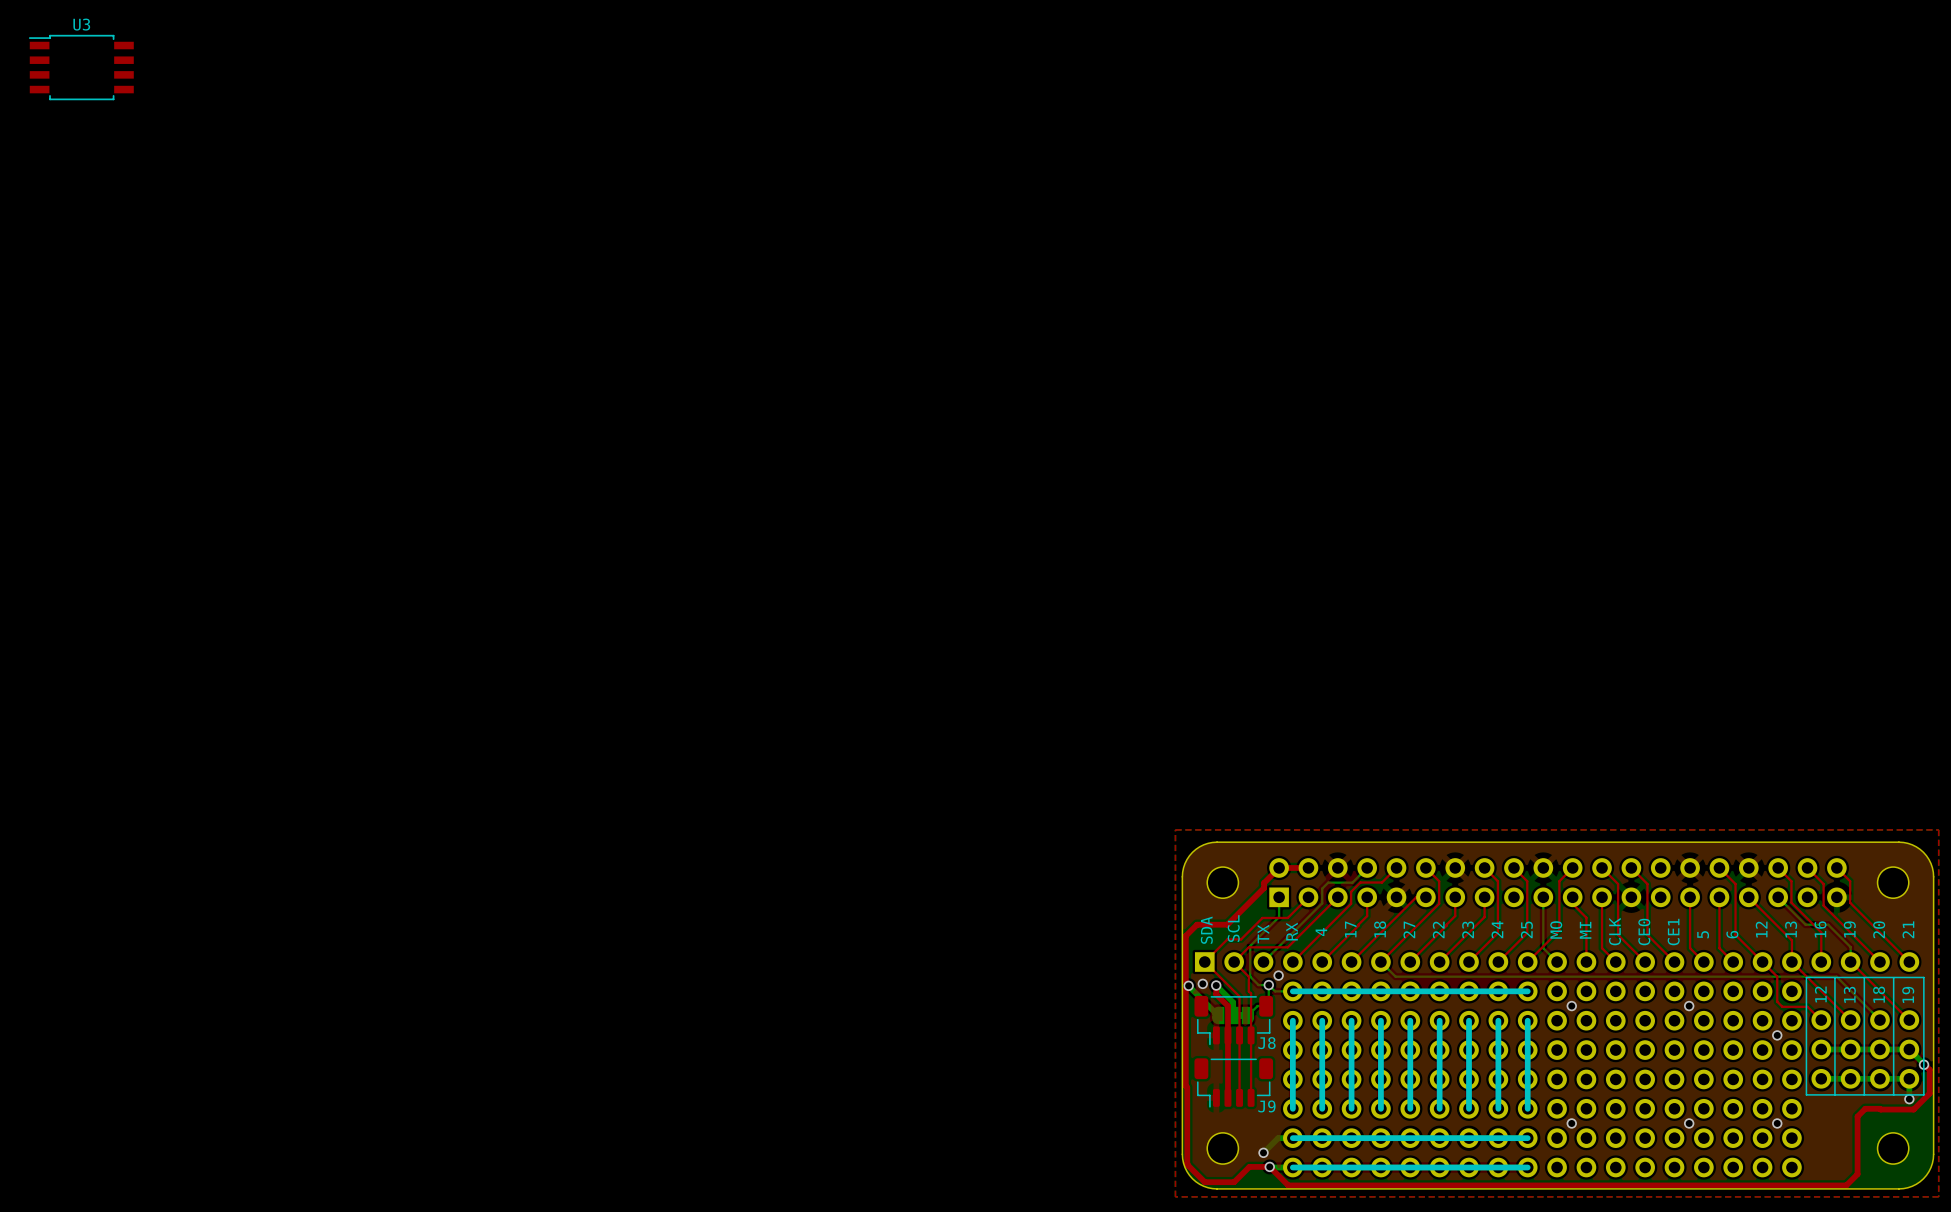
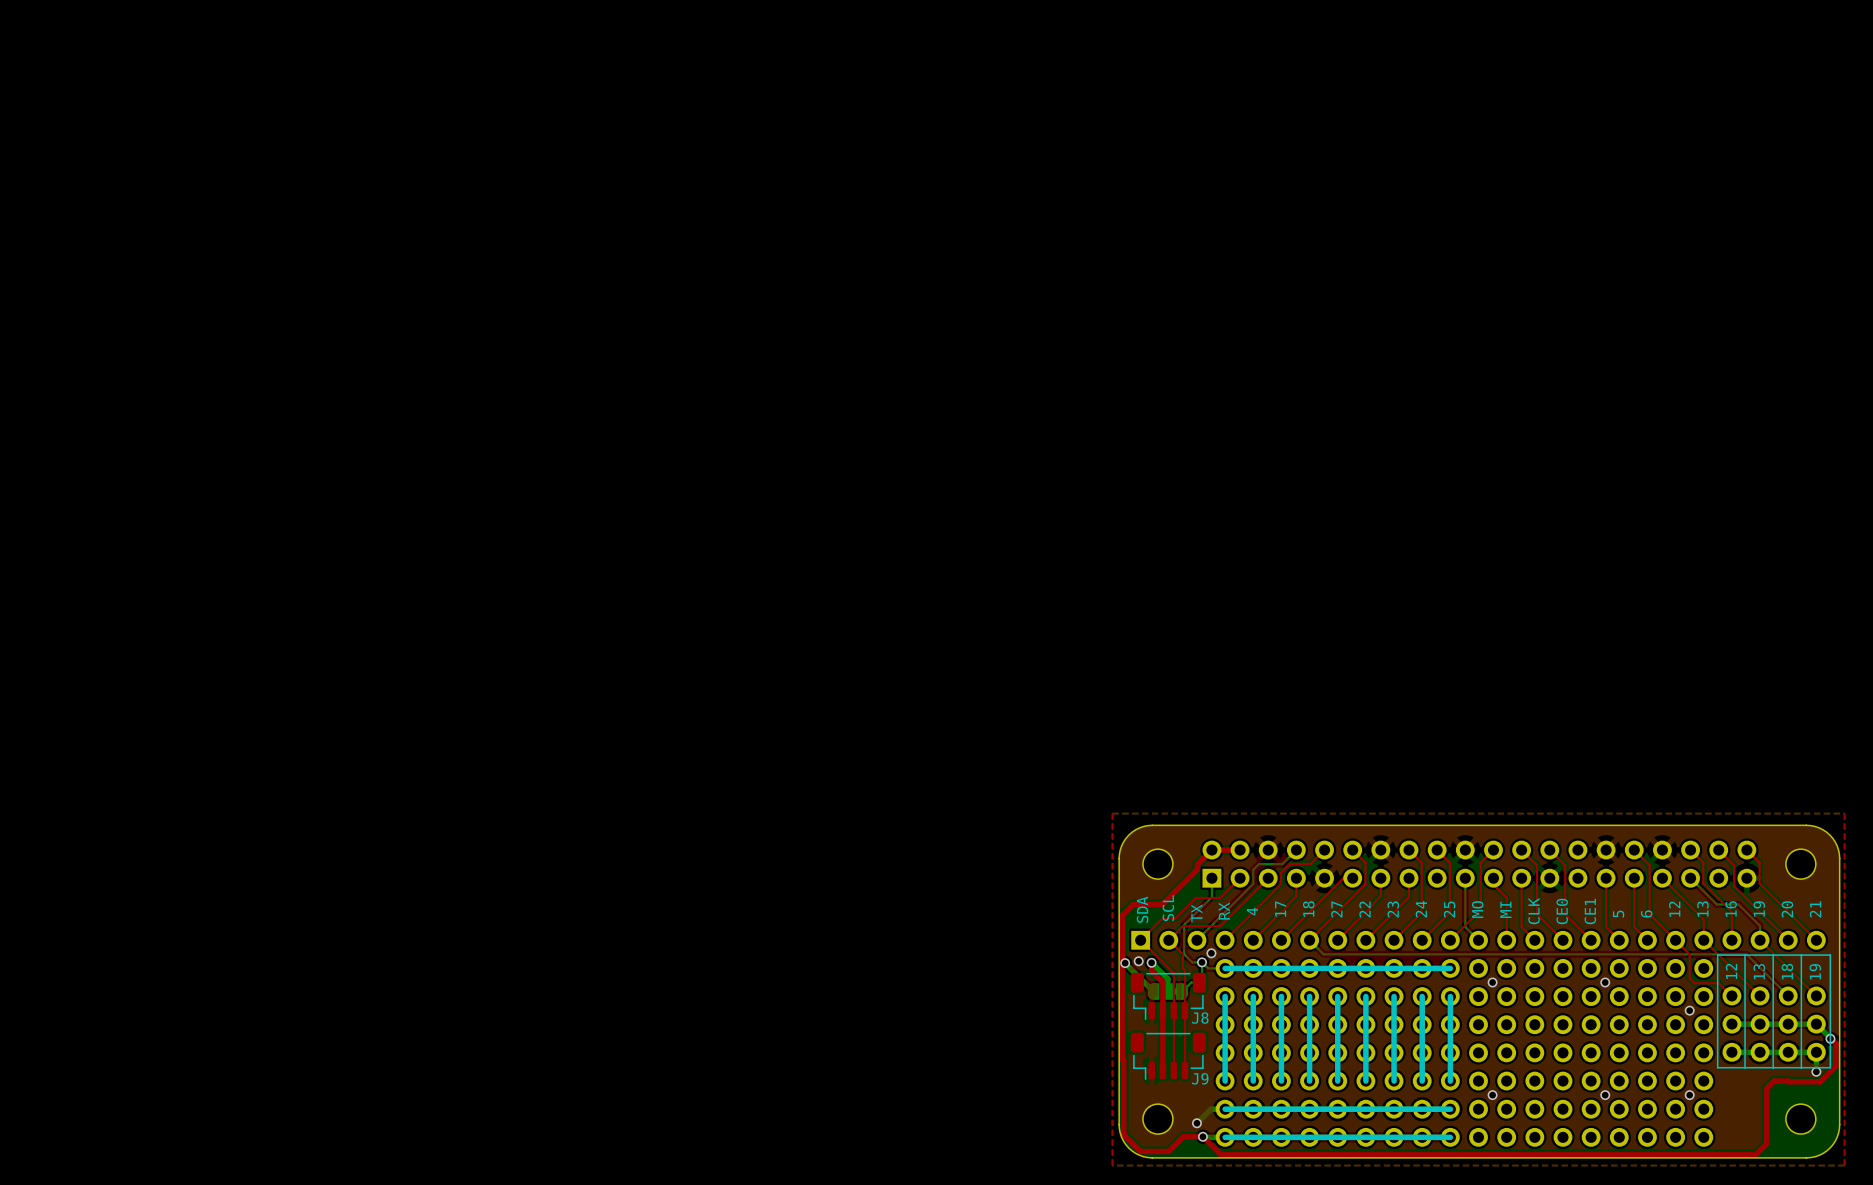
U3: (81, 67) -> none

